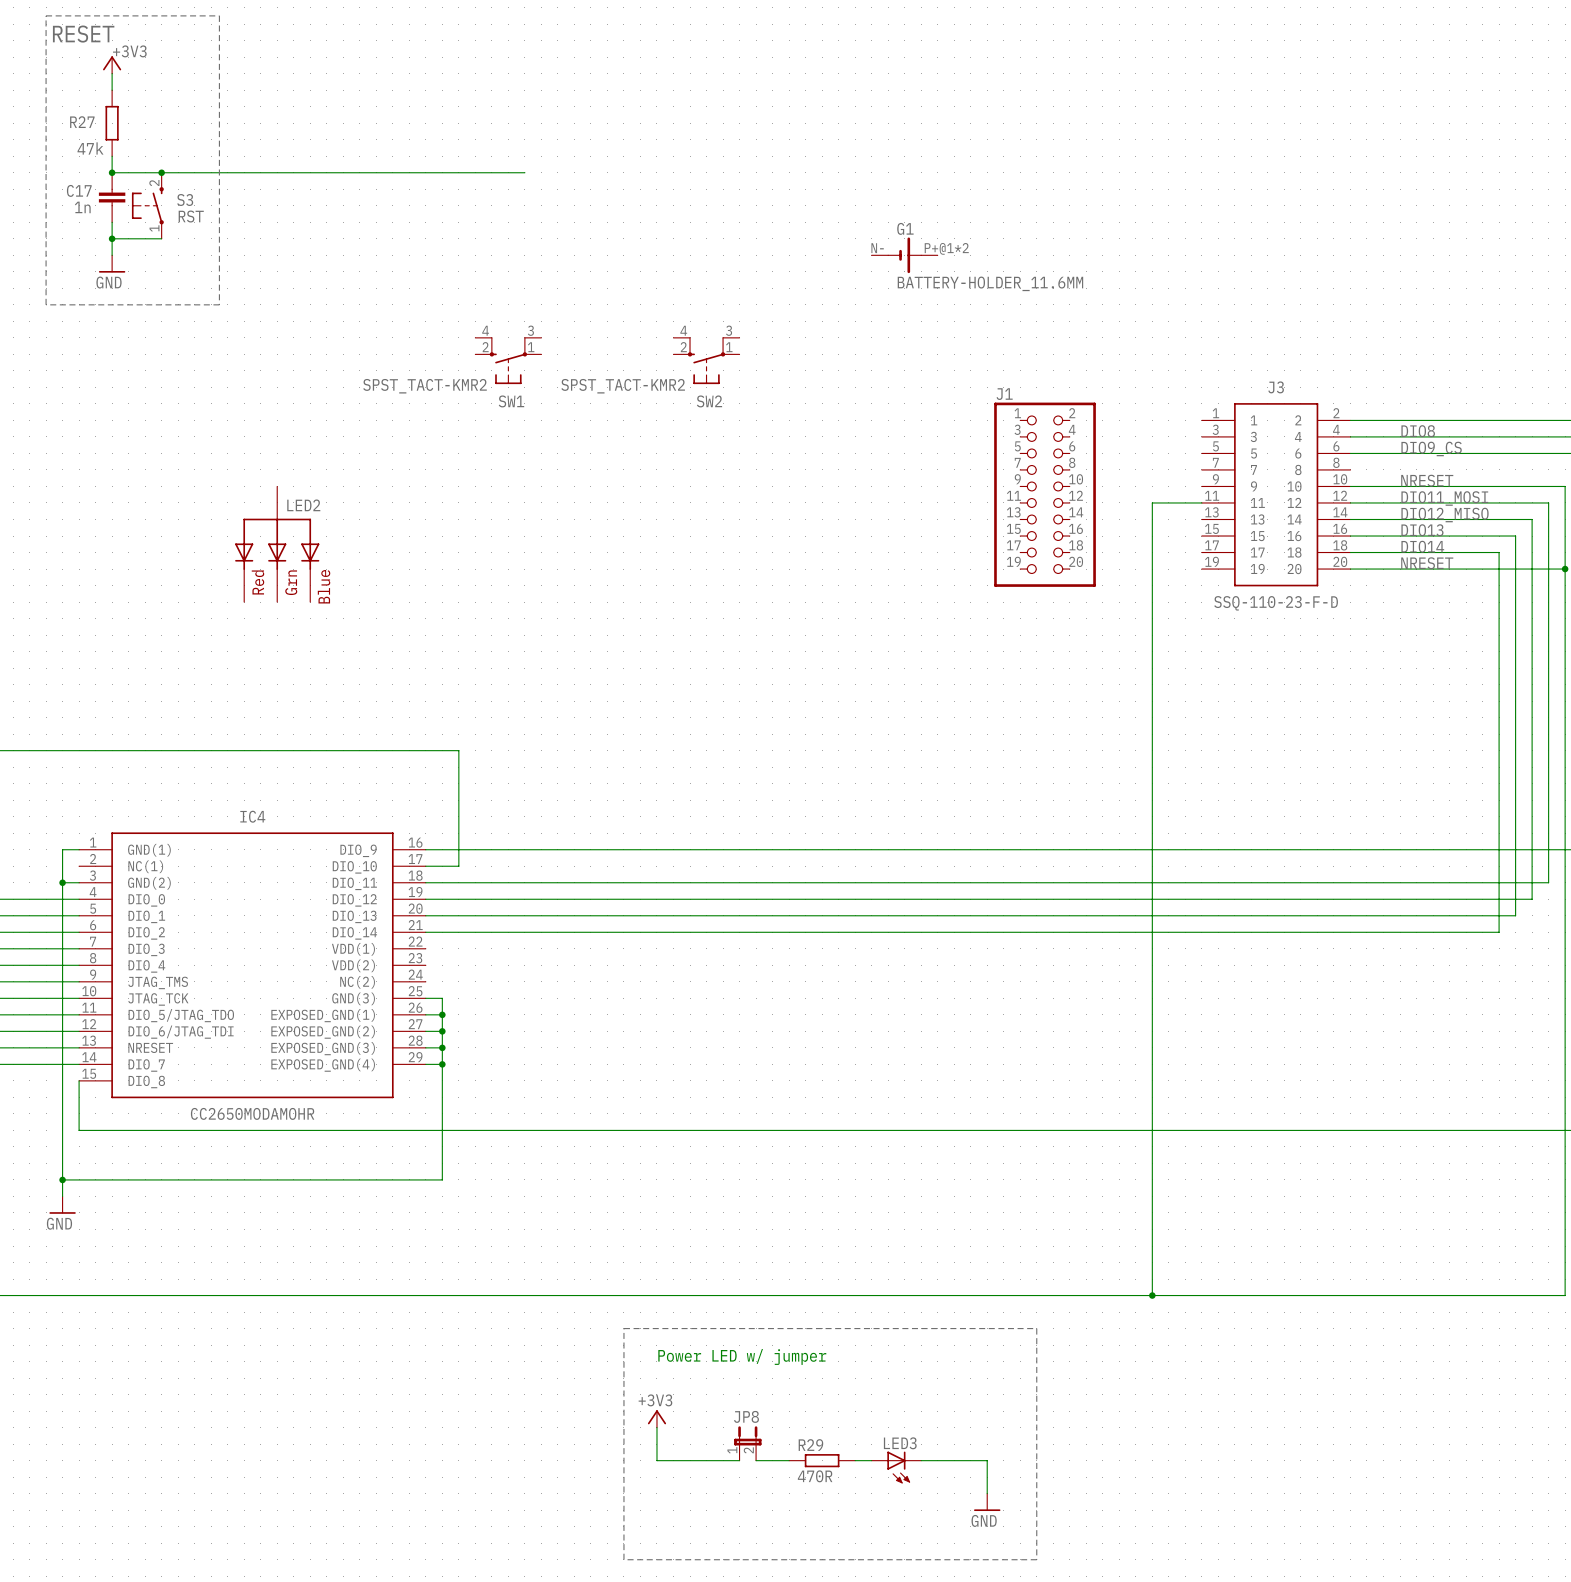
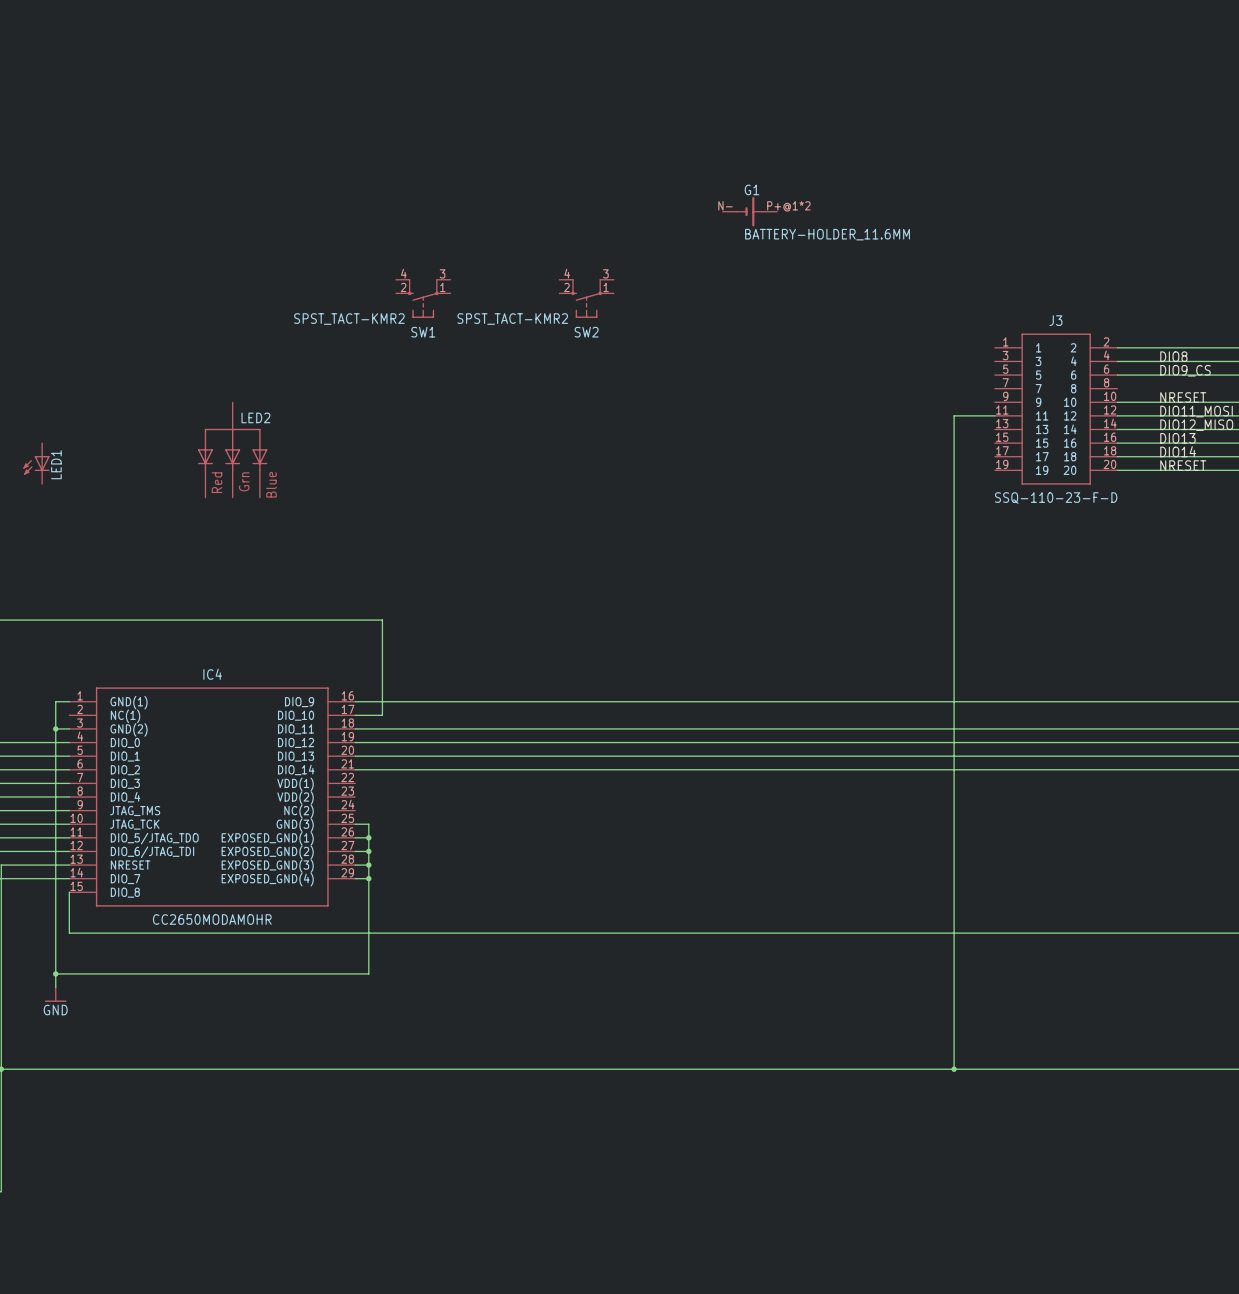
line: (46, 15) (46, 304) (219, 304) (219, 15) (46, 15) -> none
text: RESET (83, 34) -> none
power symbol: +3V3 (112, 65) -> none
wire: (112, 73) (112, 90) -> none
R27: 47k (112, 123) -> none
wire: (112, 156) (112, 172) (524, 172) -> none
junction: (112, 172) -> none
junction: (161, 172) -> none
C17: 1n (112, 197) -> none
S3: RST (147, 205) -> none
wire: (112, 222) (112, 255) -> none
wire: (112, 238) (161, 238) -> none
junction: (112, 238) -> none
power symbol: GND (112, 263) -> none
J1: (1045, 494) -> none
LED1: none -> (36, 463)
line: (623, 1328) (623, 1559) (1036, 1559) (1036, 1328) (623, 1328) -> none
text: Power LED w/ jumper (742, 1356) -> none
power symbol: +3V3 (656, 1418) -> none
wire: (656, 1427) (656, 1460) (739, 1460) -> none
JP8: (747, 1443) -> none
wire: (756, 1460) (789, 1460) -> none
R29: 470R (822, 1460) -> none
wire: (855, 1460) (871, 1460) -> none
wire: (921, 1460) (987, 1460) (987, 1493) -> none
LED3: (896, 1467) -> none
power symbol: GND (987, 1502) -> none

